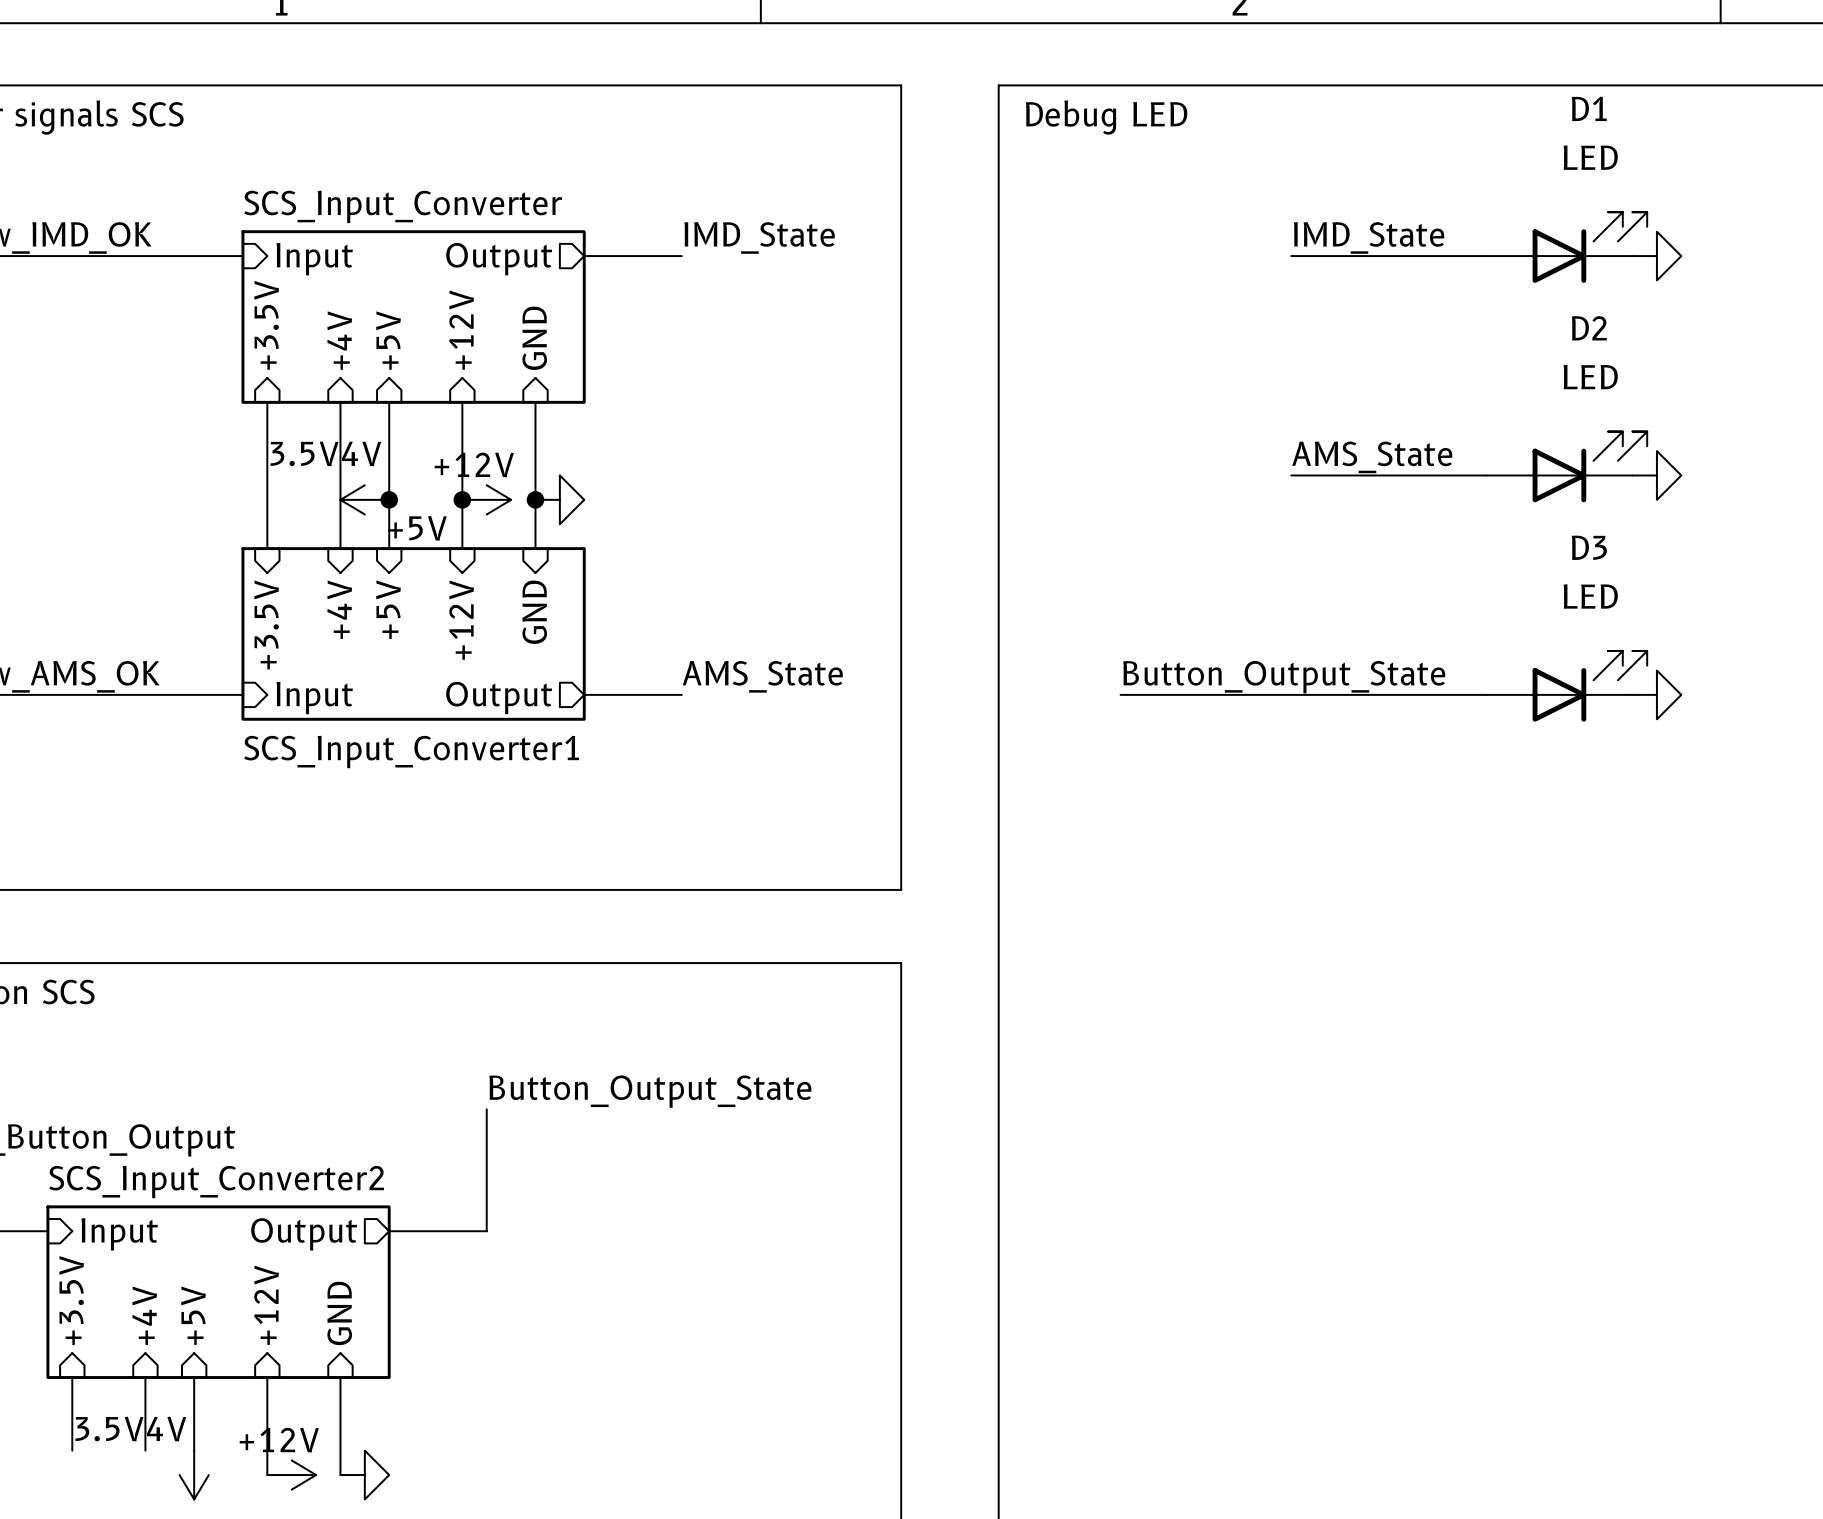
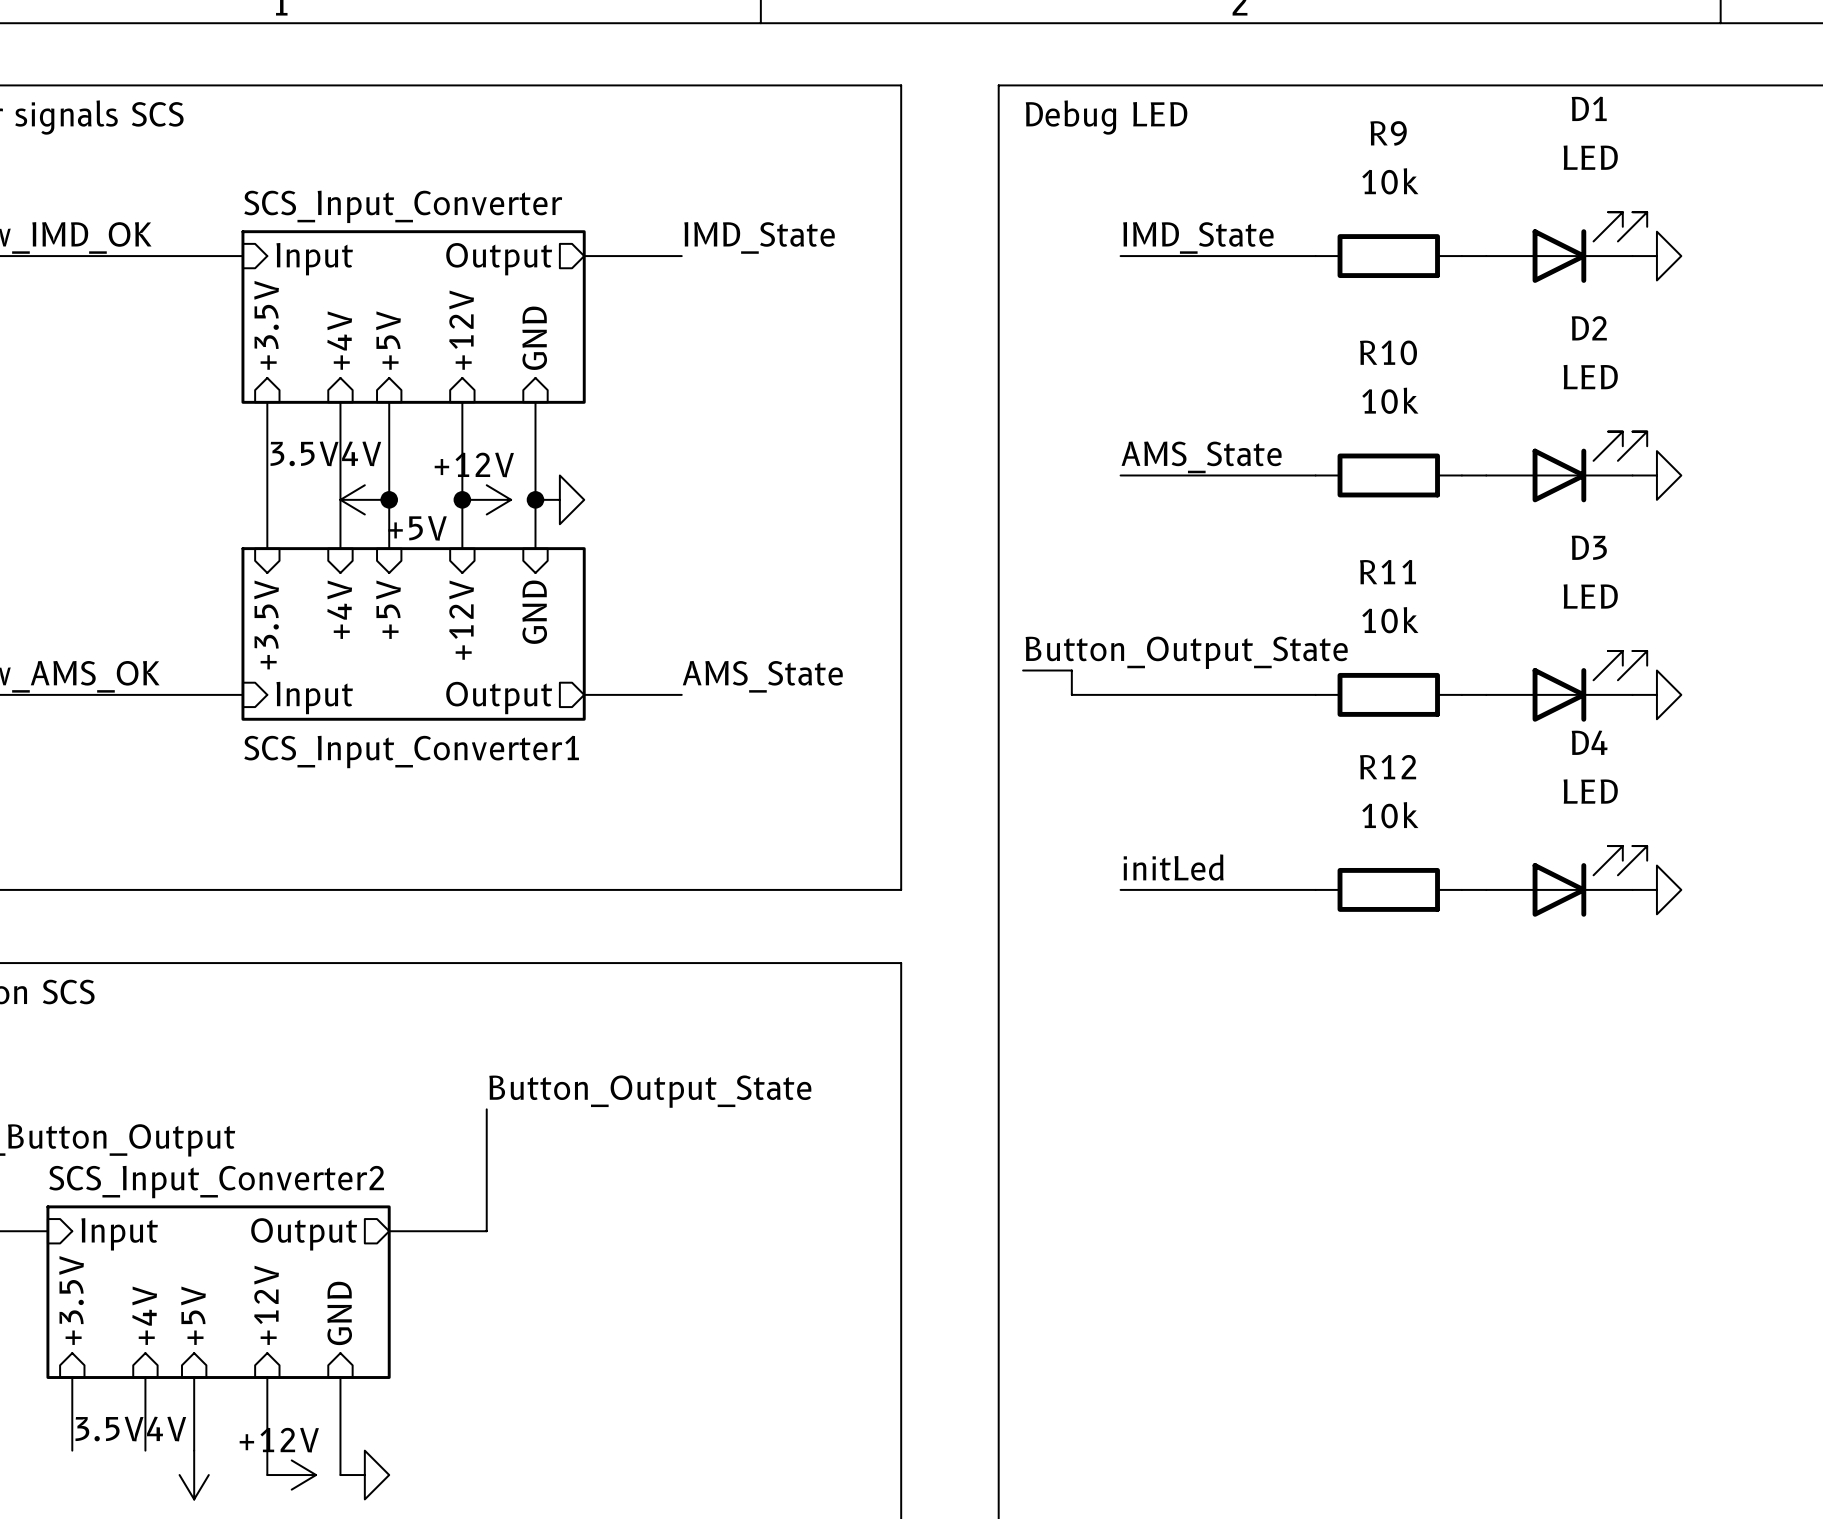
label position: IMD_State (1369, 237) -> IMD_State (1198, 237)
wire: none -> (1120, 256) (1291, 256)
wire: (1315, 256) (1461, 256) -> none
R9: none -> 10k (1388, 256)
label position: AMS_State (1372, 457) -> AMS_State (1201, 457)
wire: none -> (1120, 475) (1291, 475)
wire: (1315, 475) (1461, 475) -> none
R10: none -> 10k (1388, 475)
wire: none -> (1023, 670) (1071, 670) (1071, 694) (1120, 694)
label position: Button_Output_State (1284, 677) -> Button_Output_State (1186, 652)
wire: (1315, 694) (1461, 694) -> none
R11: none -> 10k (1388, 694)
label: none -> initLed (1173, 867)
D4: none -> LED (1566, 881)
wire: none -> (1120, 889) (1315, 889)
R12: none -> 10k (1388, 889)
wire: none -> (1461, 889) (1486, 889)
power symbol: none -> (1656, 889)

